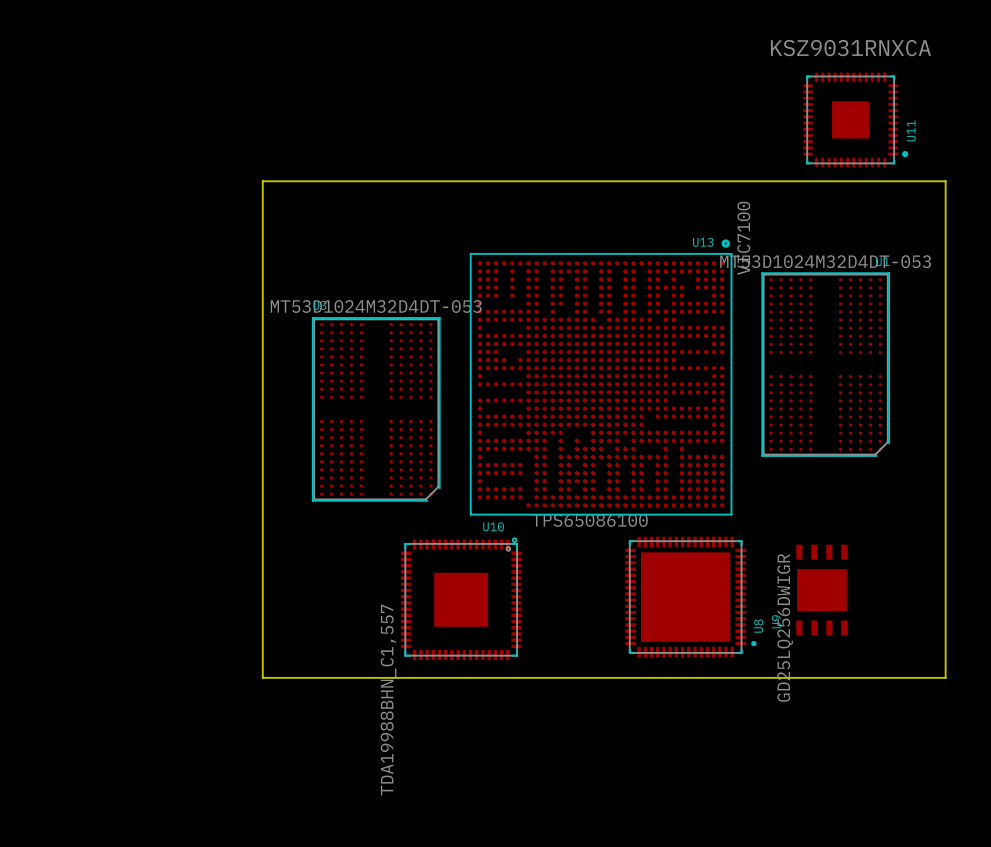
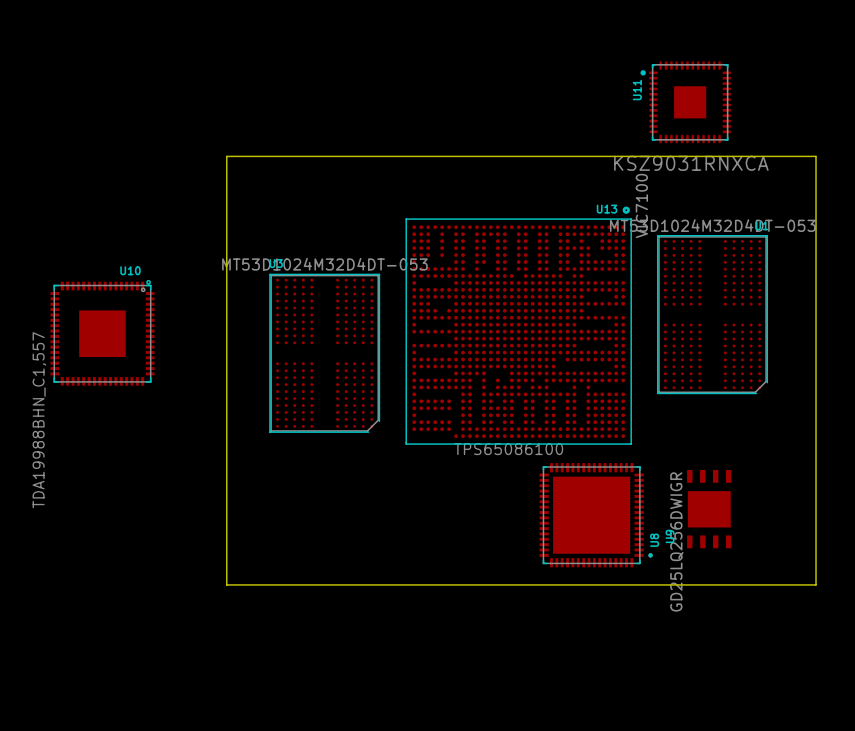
U11 rotation: 0° (855, 119) -> 180° (685, 102)
U10 position: (461, 598) -> (102, 332)

